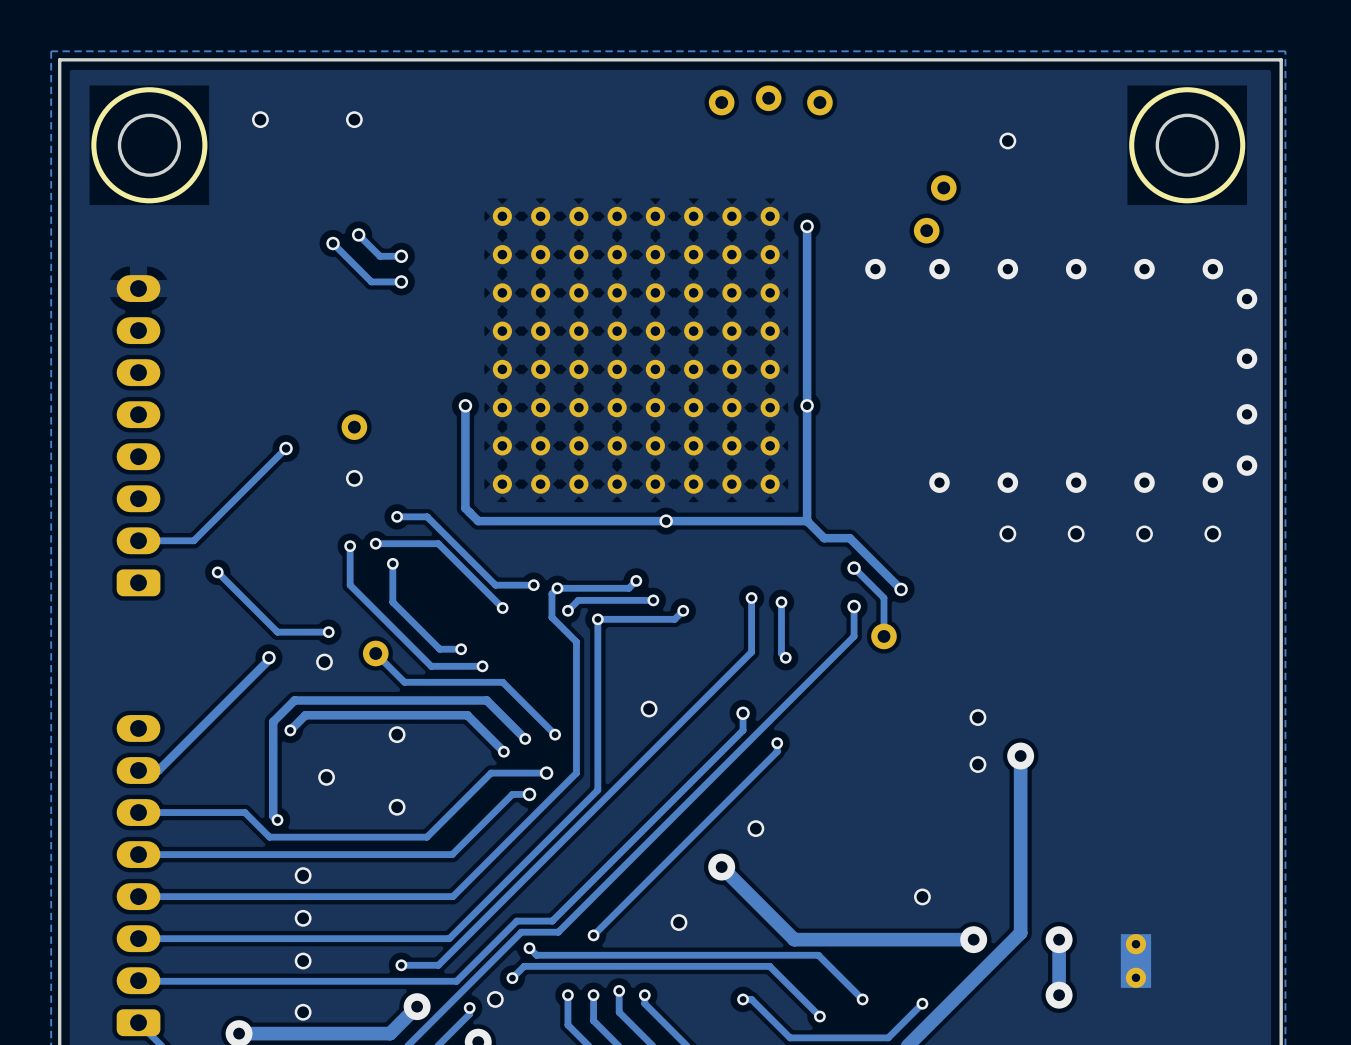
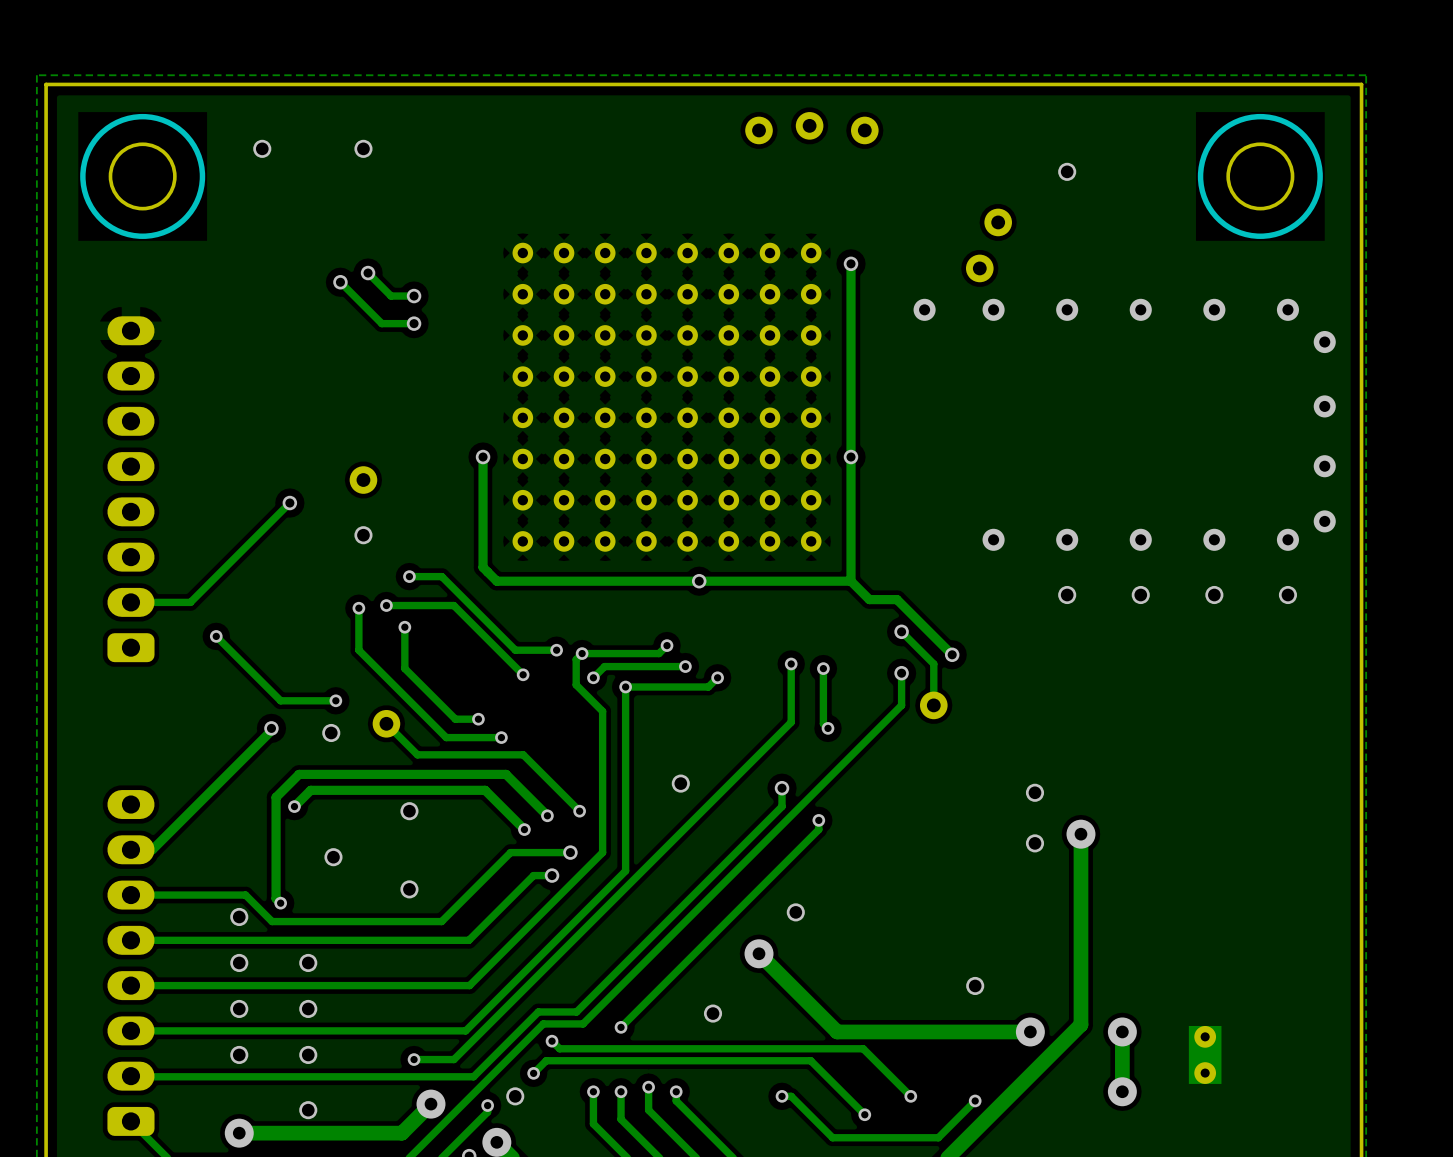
via: none -> (239, 916)
via: none -> (239, 962)
via: none -> (239, 1008)
via: none -> (239, 1054)

